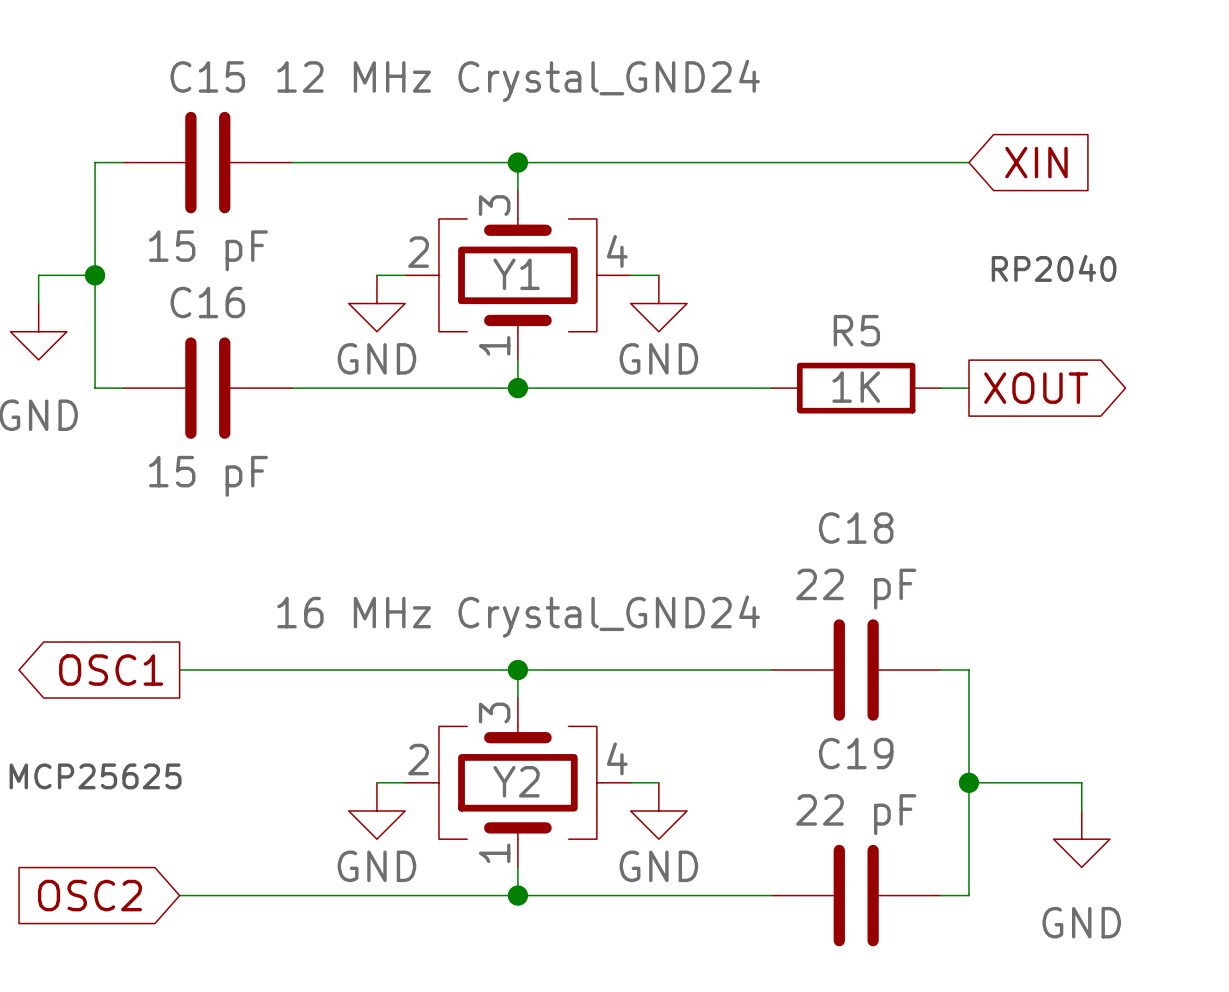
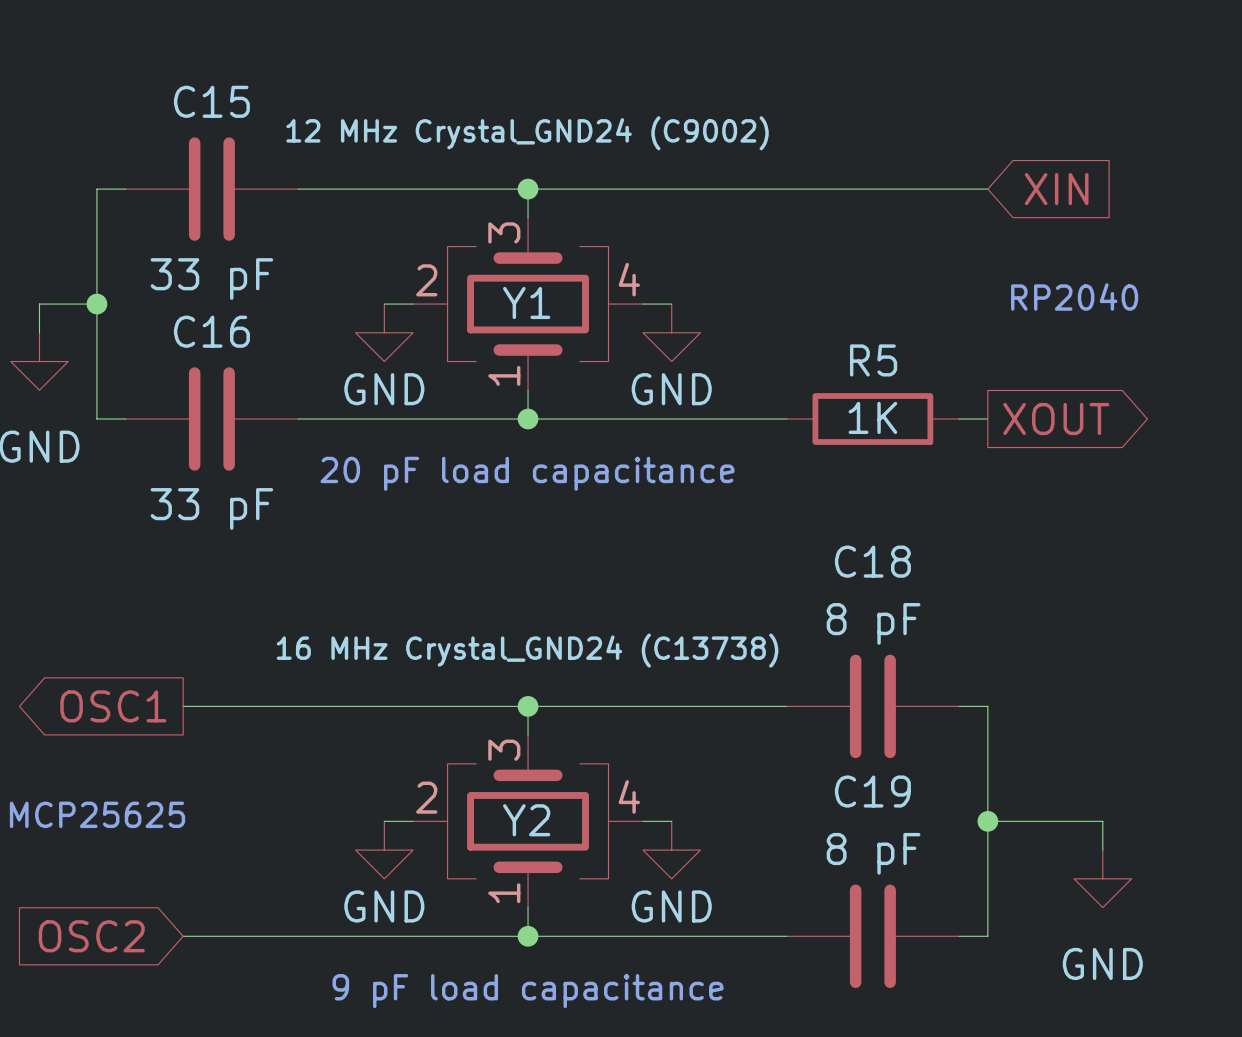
Y1 value: 12 MHz Crystal_GND24 (518, 80) -> 12 MHz Crystal_GND24 (C9002) (527, 133)
C15 value: 15 pF (208, 250) -> 33 pF (211, 279)
text: none -> 20 pF load capacitance (527, 473)
C16 value: 15 pF (208, 476) -> 33 pF (211, 508)
C18 value: 22 pF (856, 589) -> 8 pF (873, 623)
Y2 value: 16 MHz Crystal_GND24 (518, 616) -> 16 MHz Crystal_GND24 (C13738) (527, 650)
C19 value: 22 pF (856, 814) -> 8 pF (873, 853)
text: none -> 9 pF load capacitance (528, 991)

